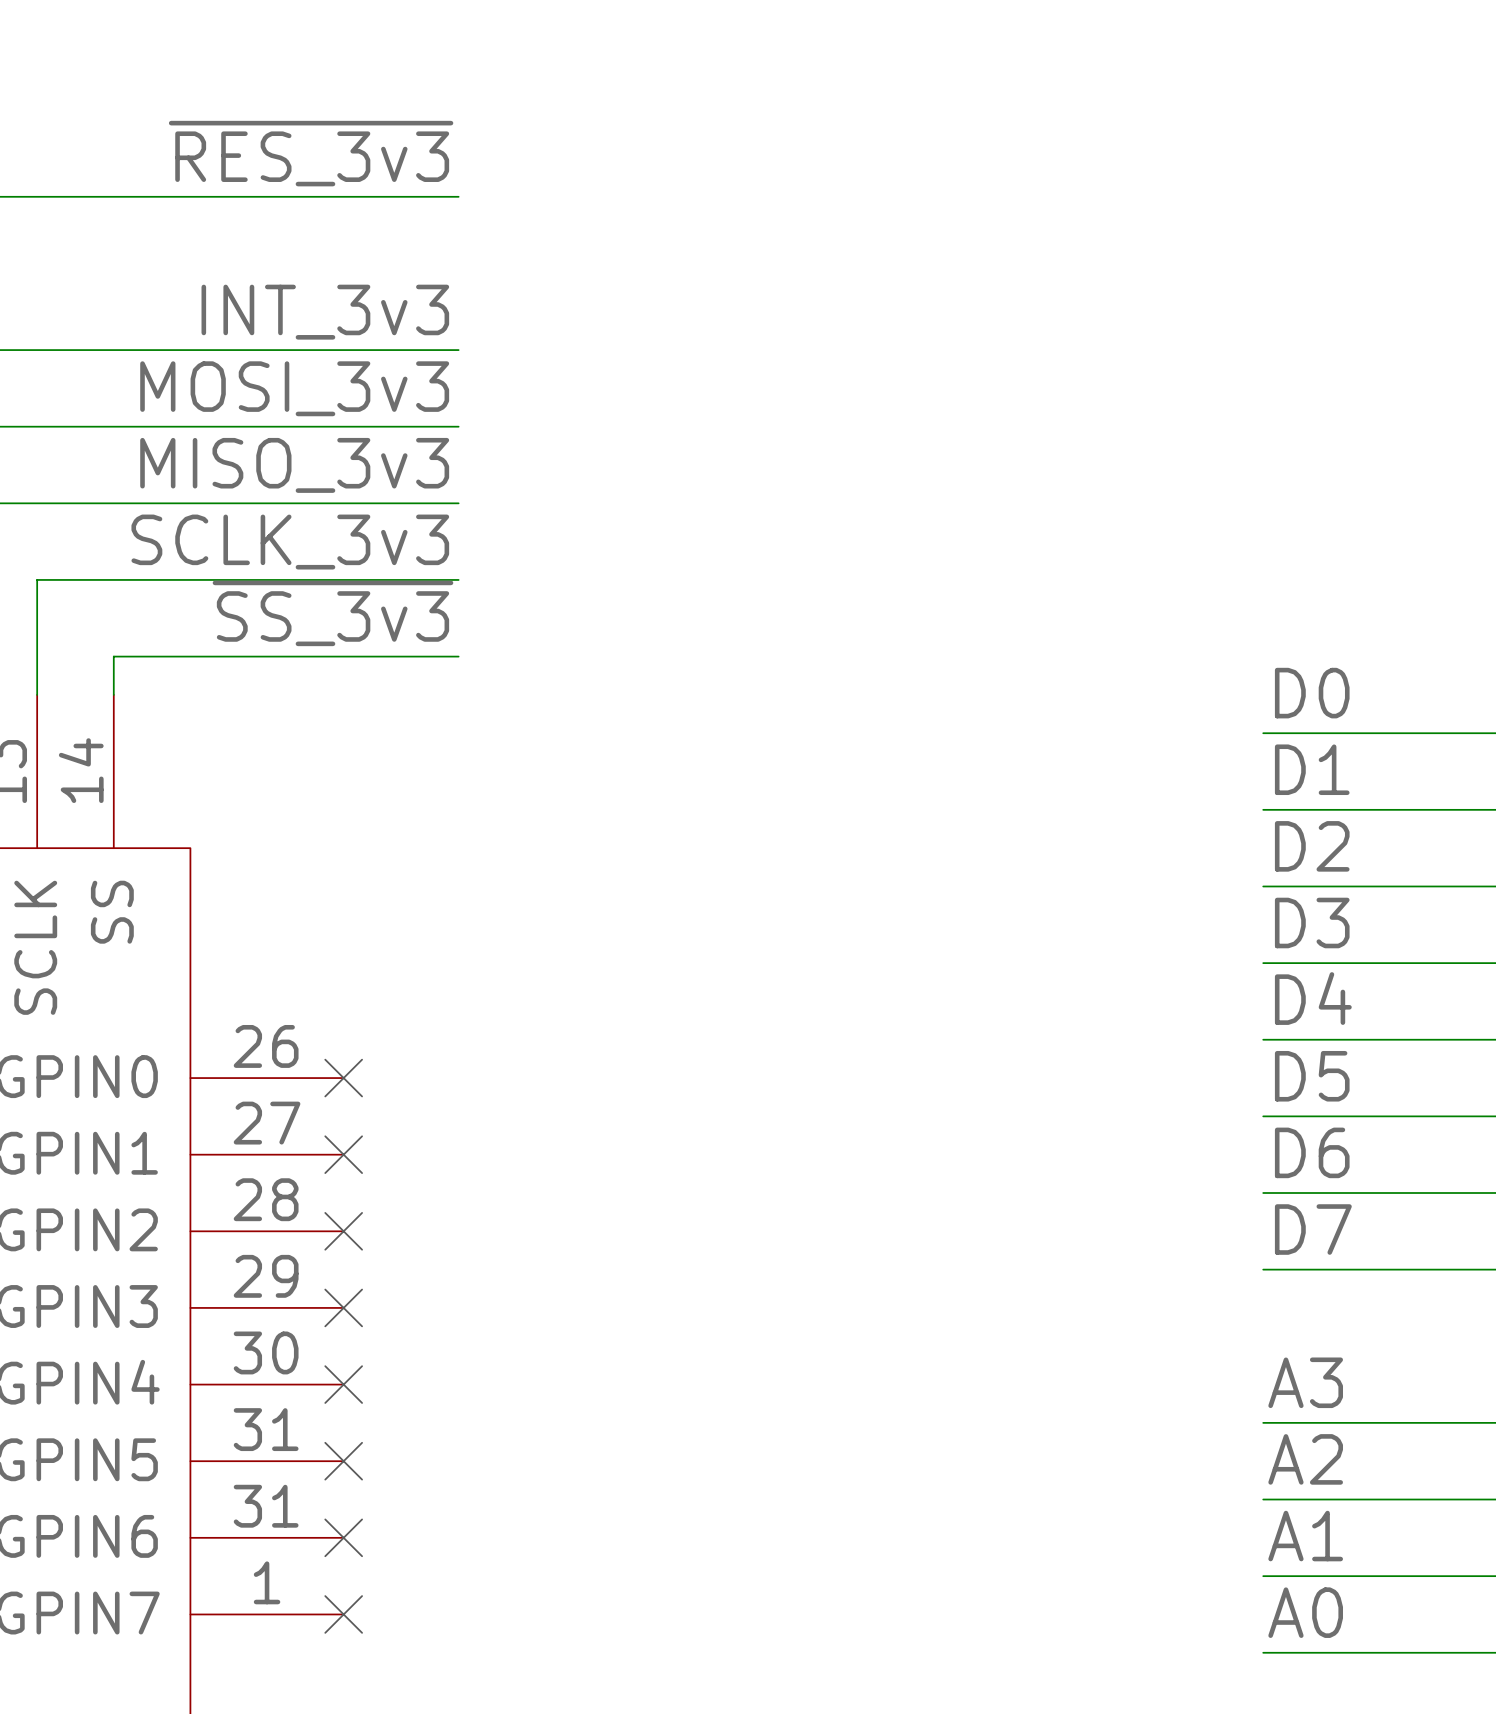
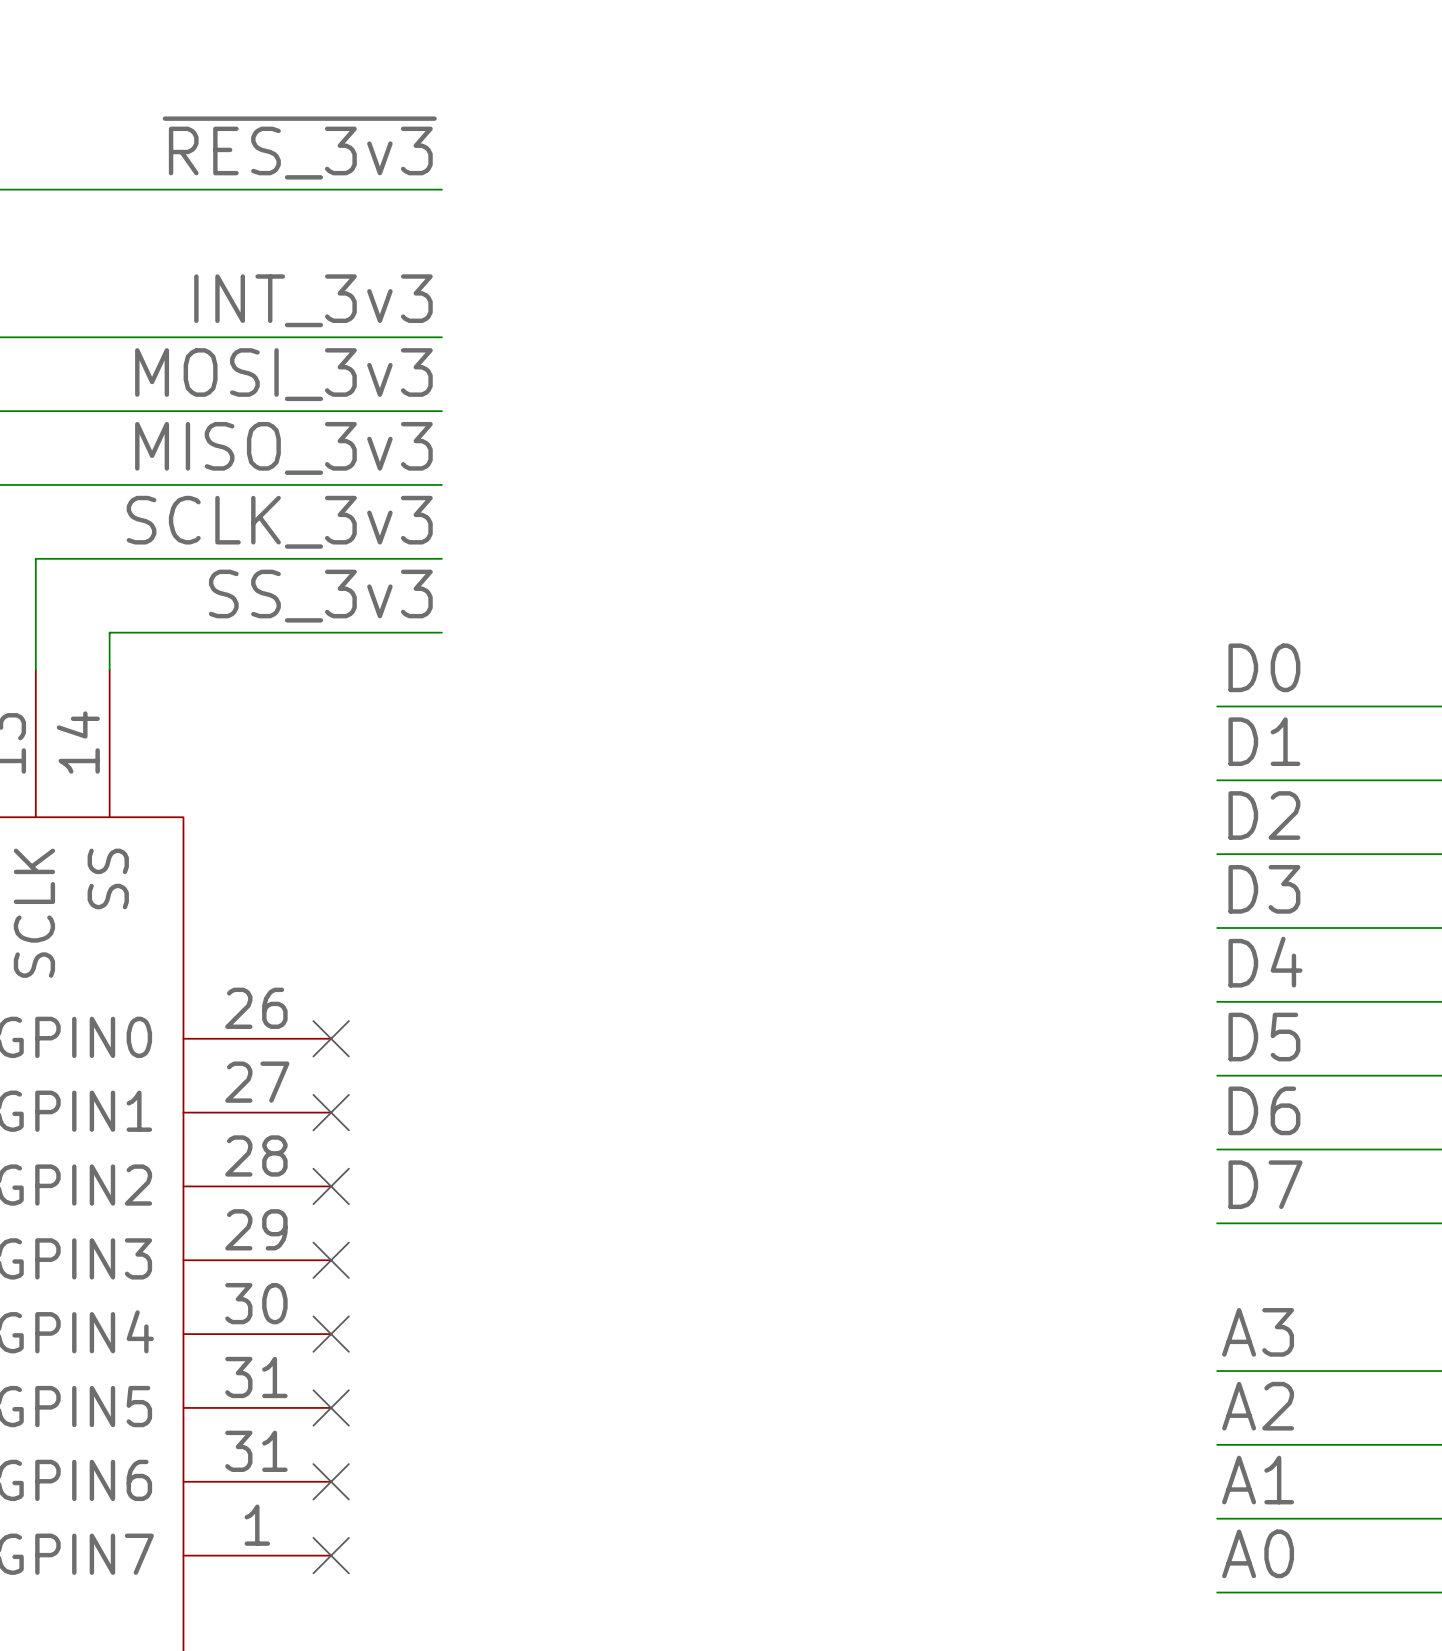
label: ~{SS_3v3} (332, 613) -> SS_3v3 (320, 596)

